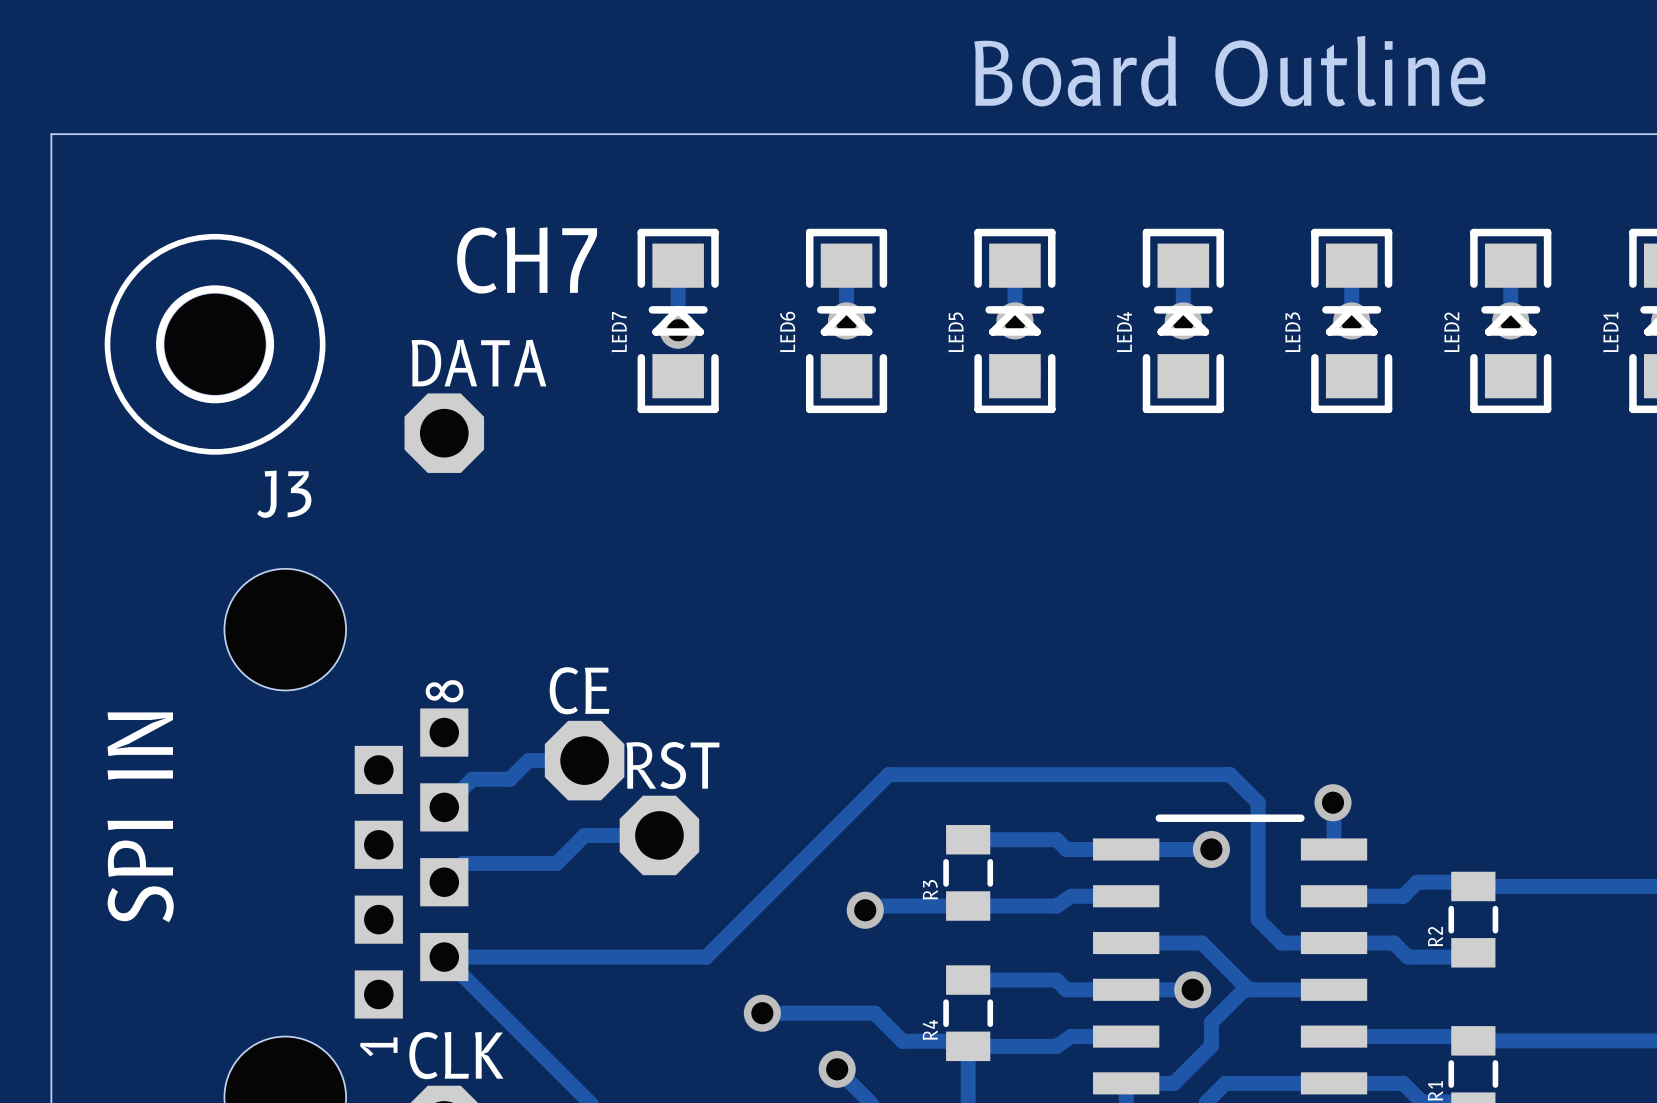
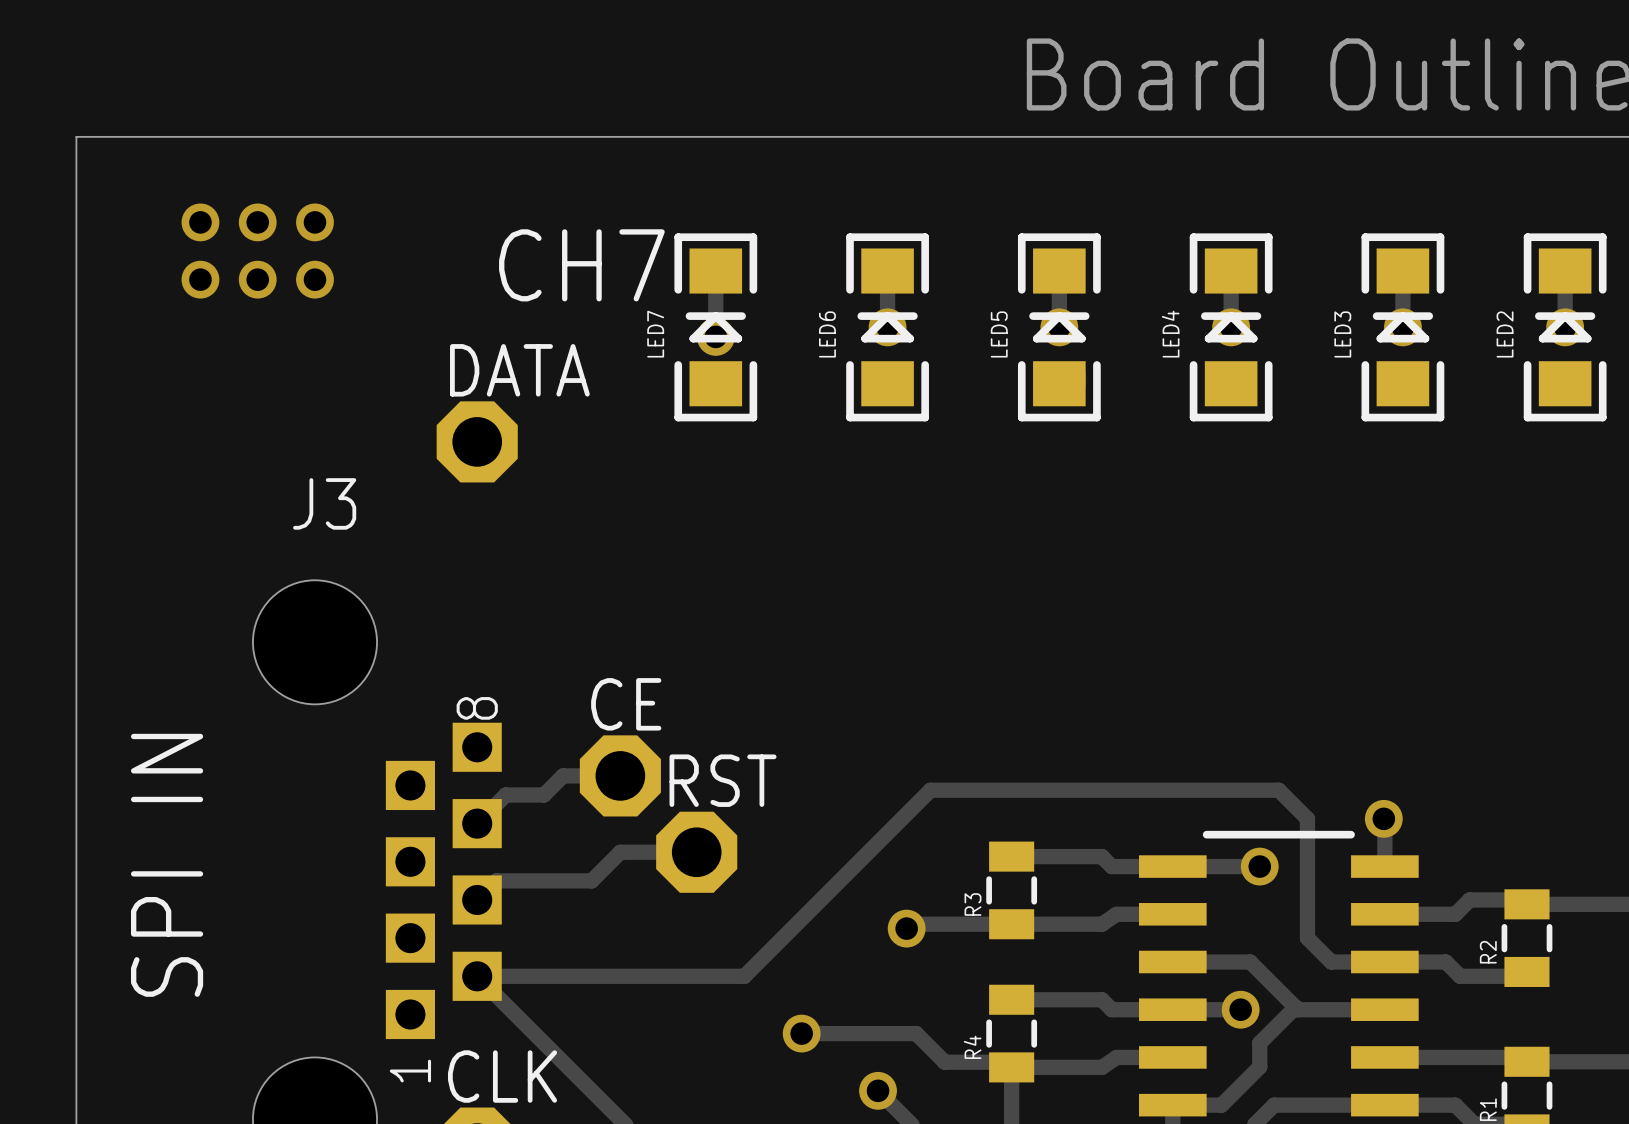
via: none -> (200, 222)
via: none -> (257, 222)
via: none -> (314, 222)
via: none -> (200, 279)
via: none -> (257, 279)
via: none -> (314, 279)
part: (215, 344) -> none

